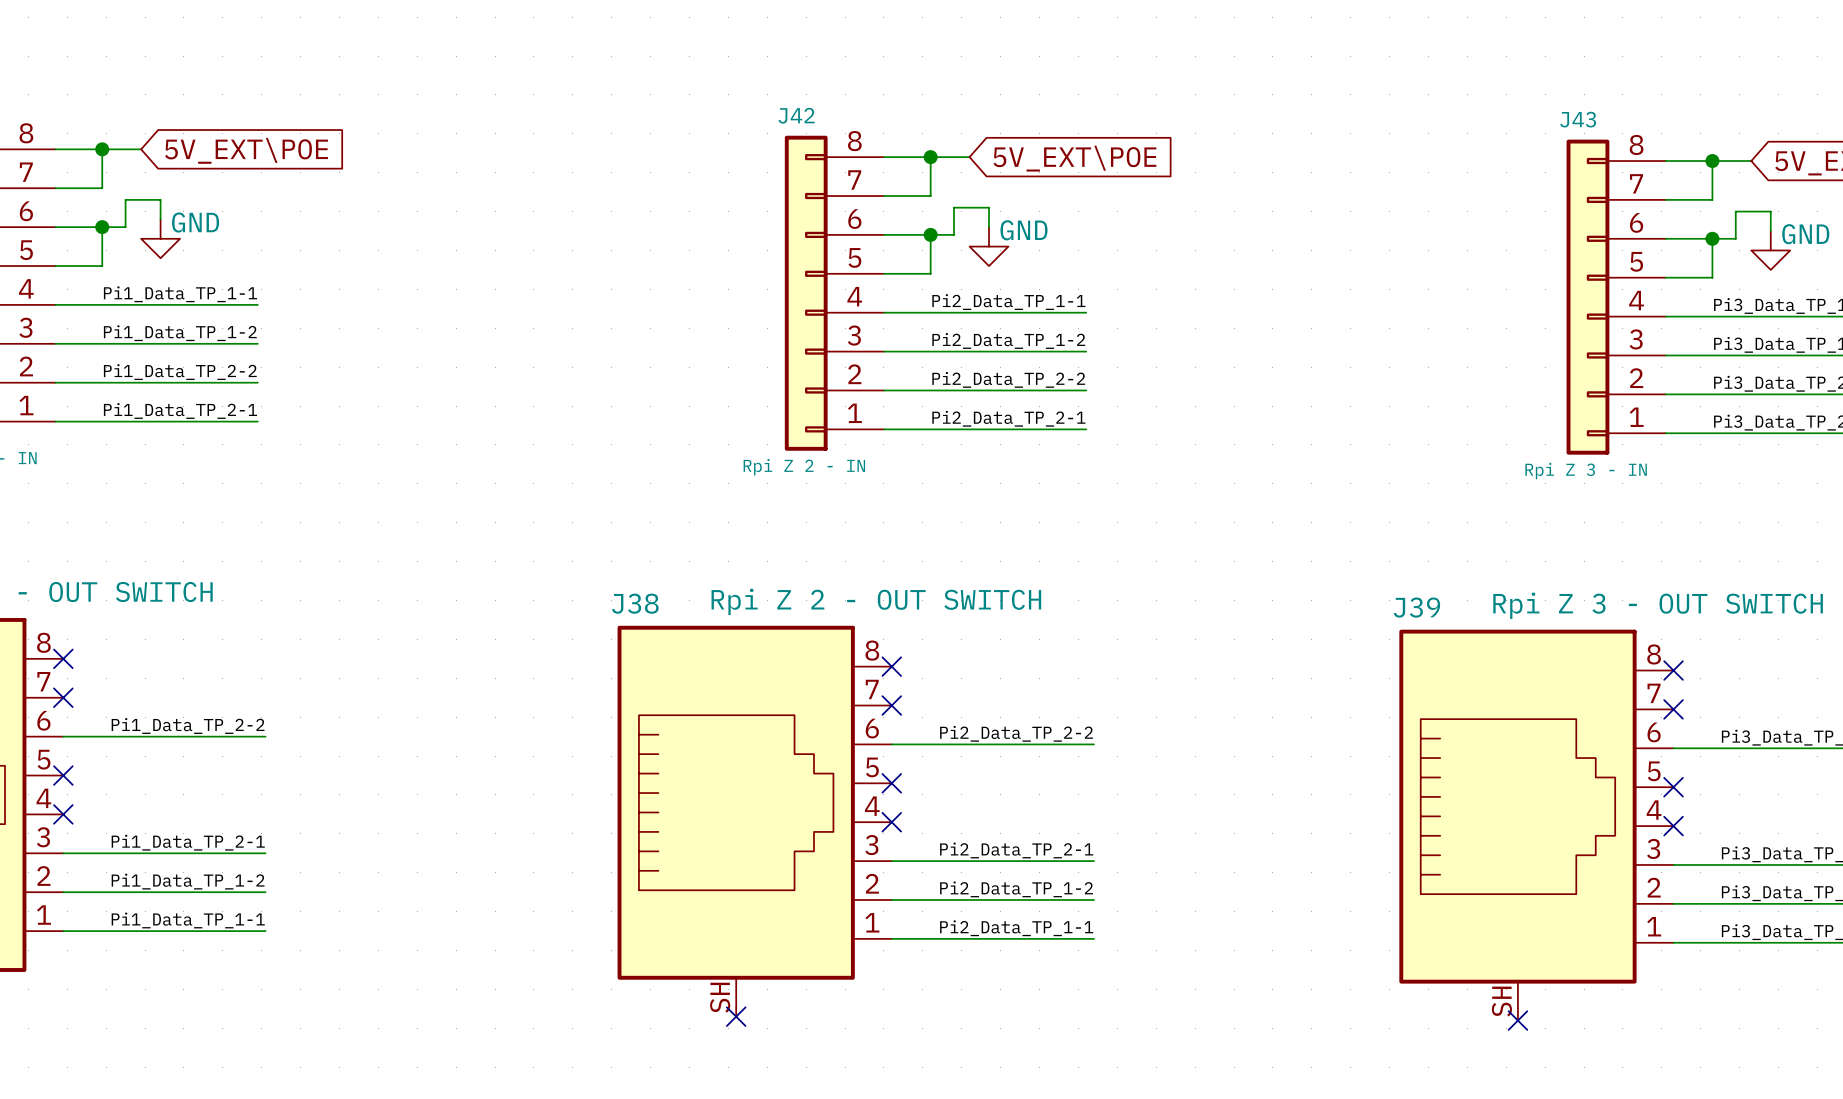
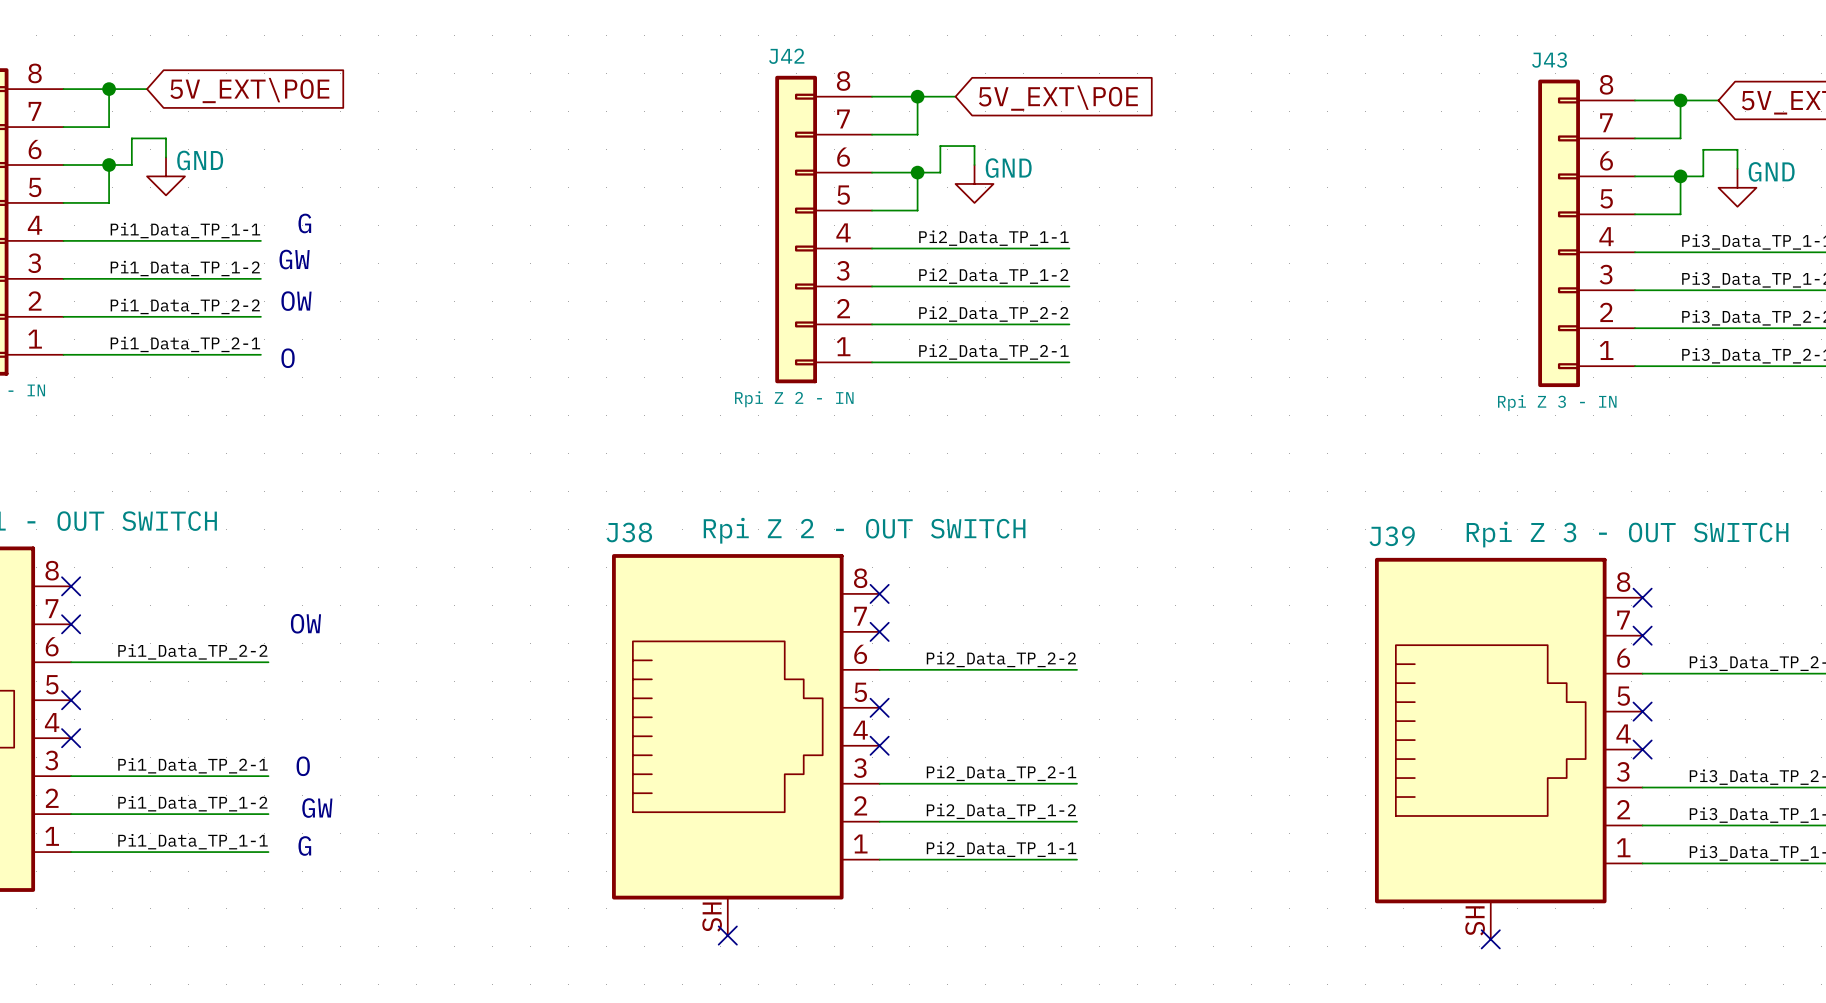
text: none -> G (304, 223)
text: none -> GW (294, 259)
text: none -> OW (296, 301)
text: none -> O (288, 358)
text: none -> OW (305, 623)
text: none -> O (303, 766)
text: none -> GW (317, 808)
text: none -> G (304, 845)

